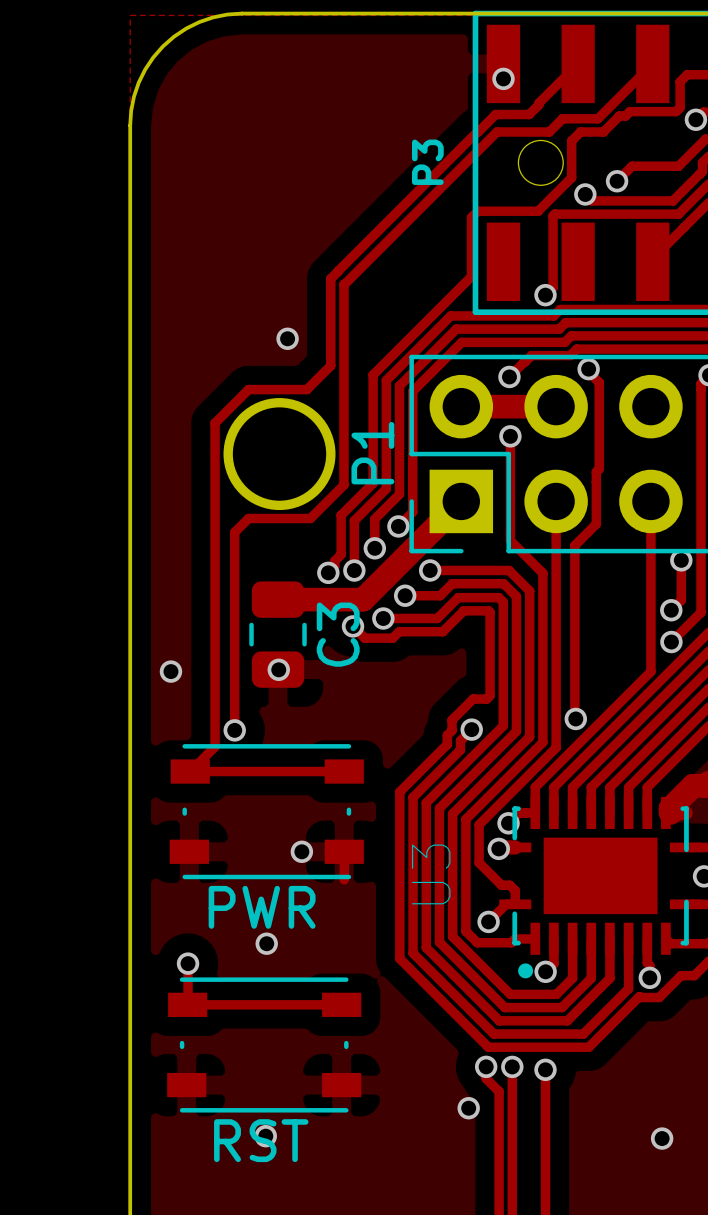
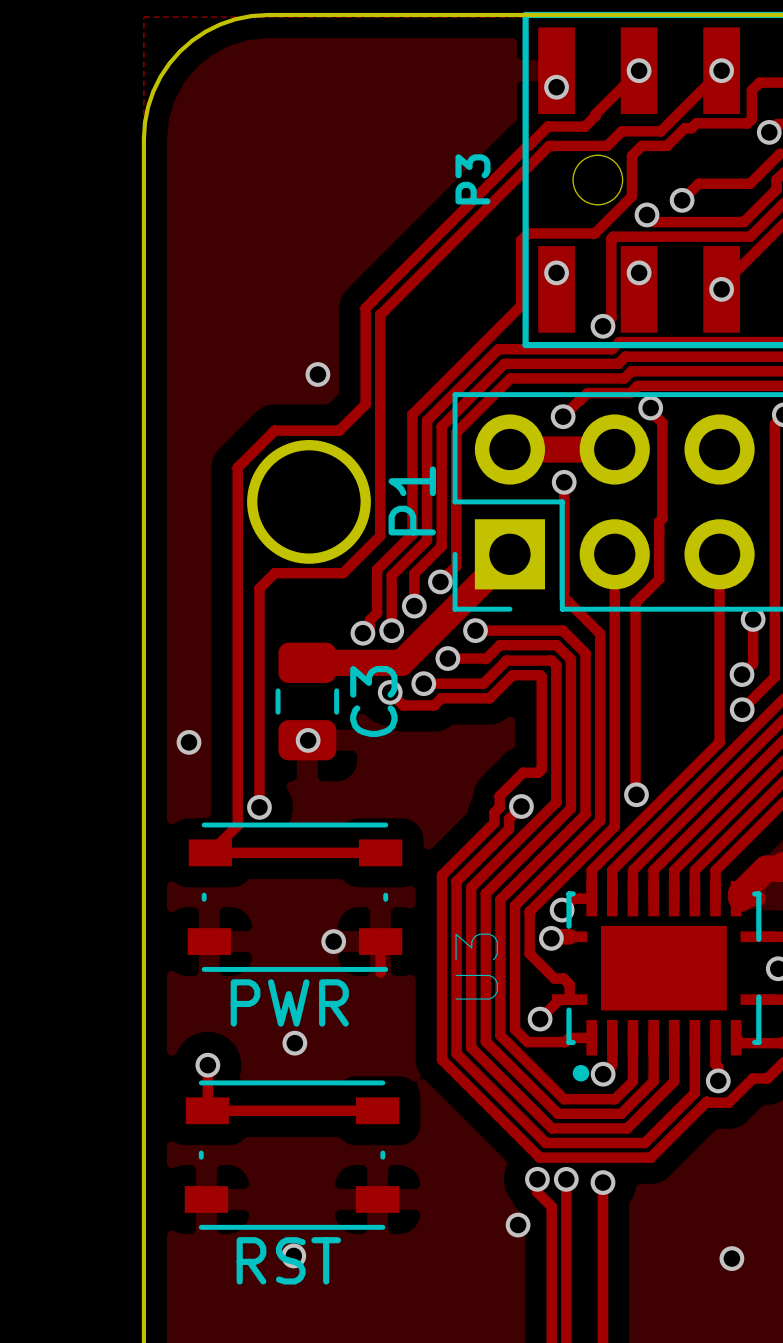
via: none -> (639, 70)
via: none -> (721, 70)
via: none -> (556, 272)
via: none -> (639, 272)
via: none -> (721, 289)

